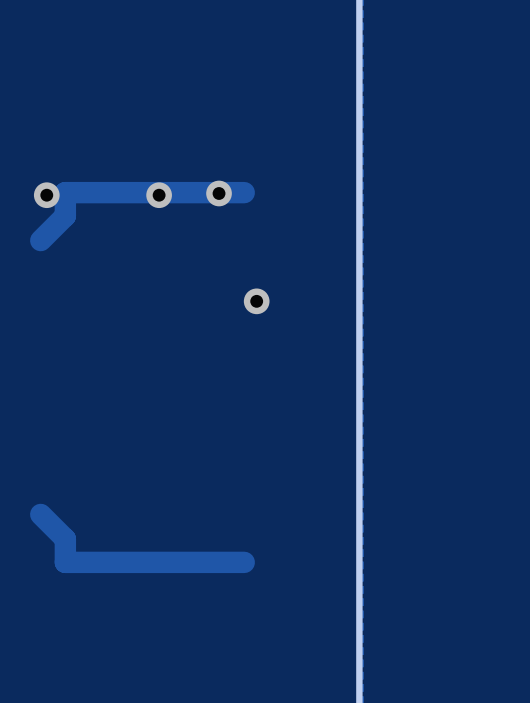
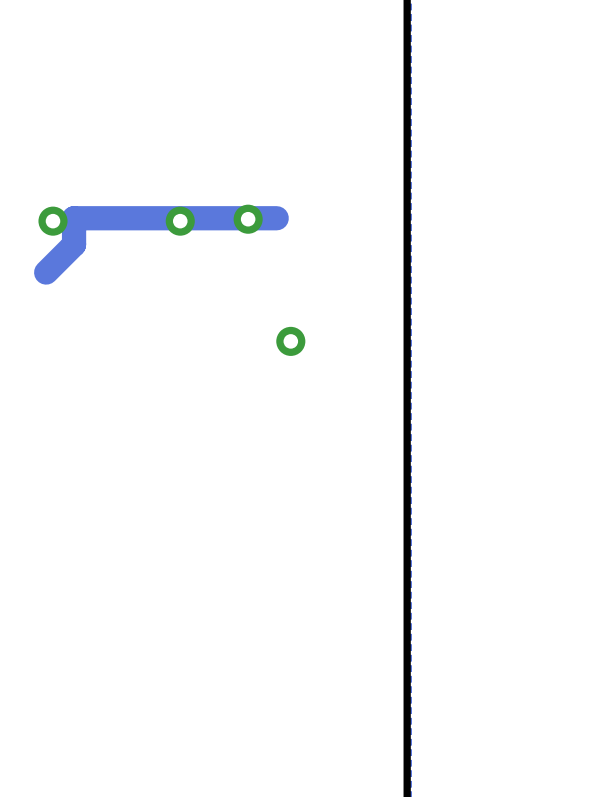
track: (40, 514) (65, 539) (65, 562) (244, 562) -> none

